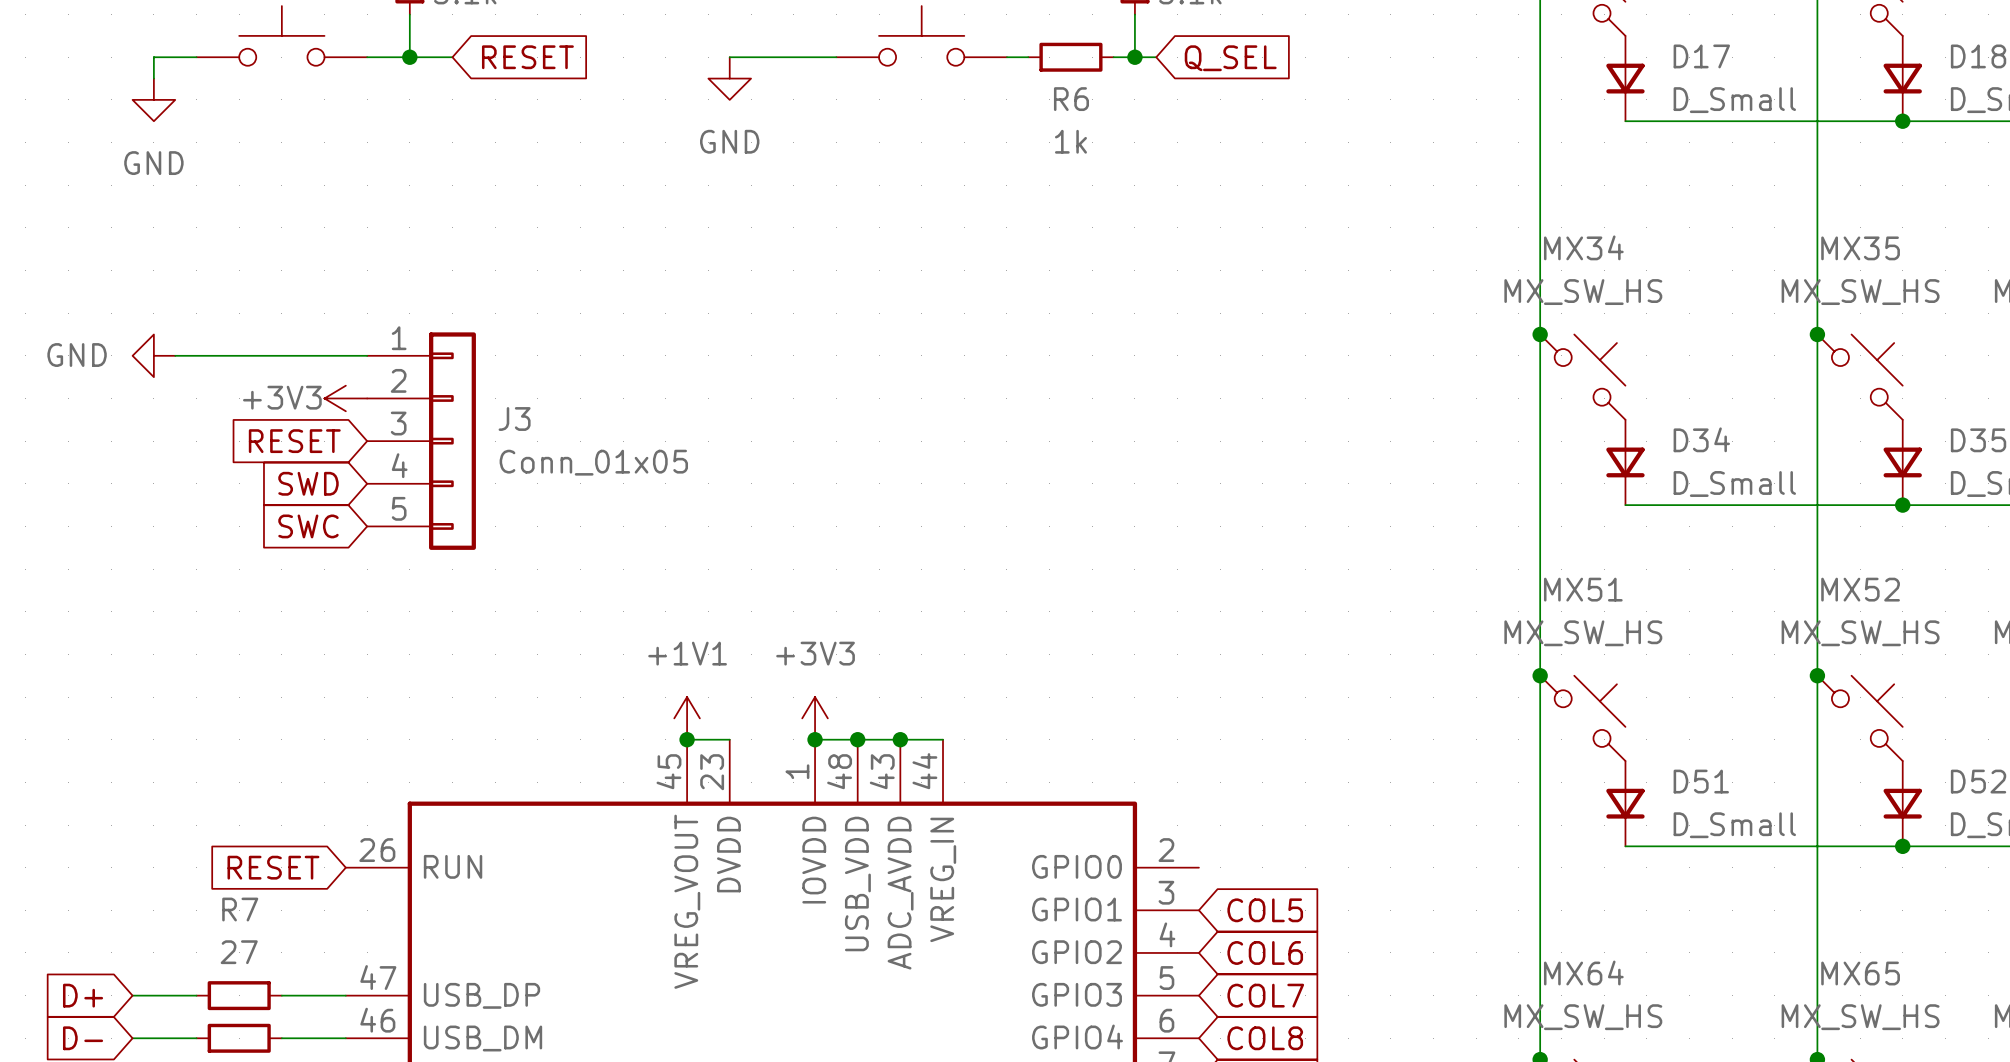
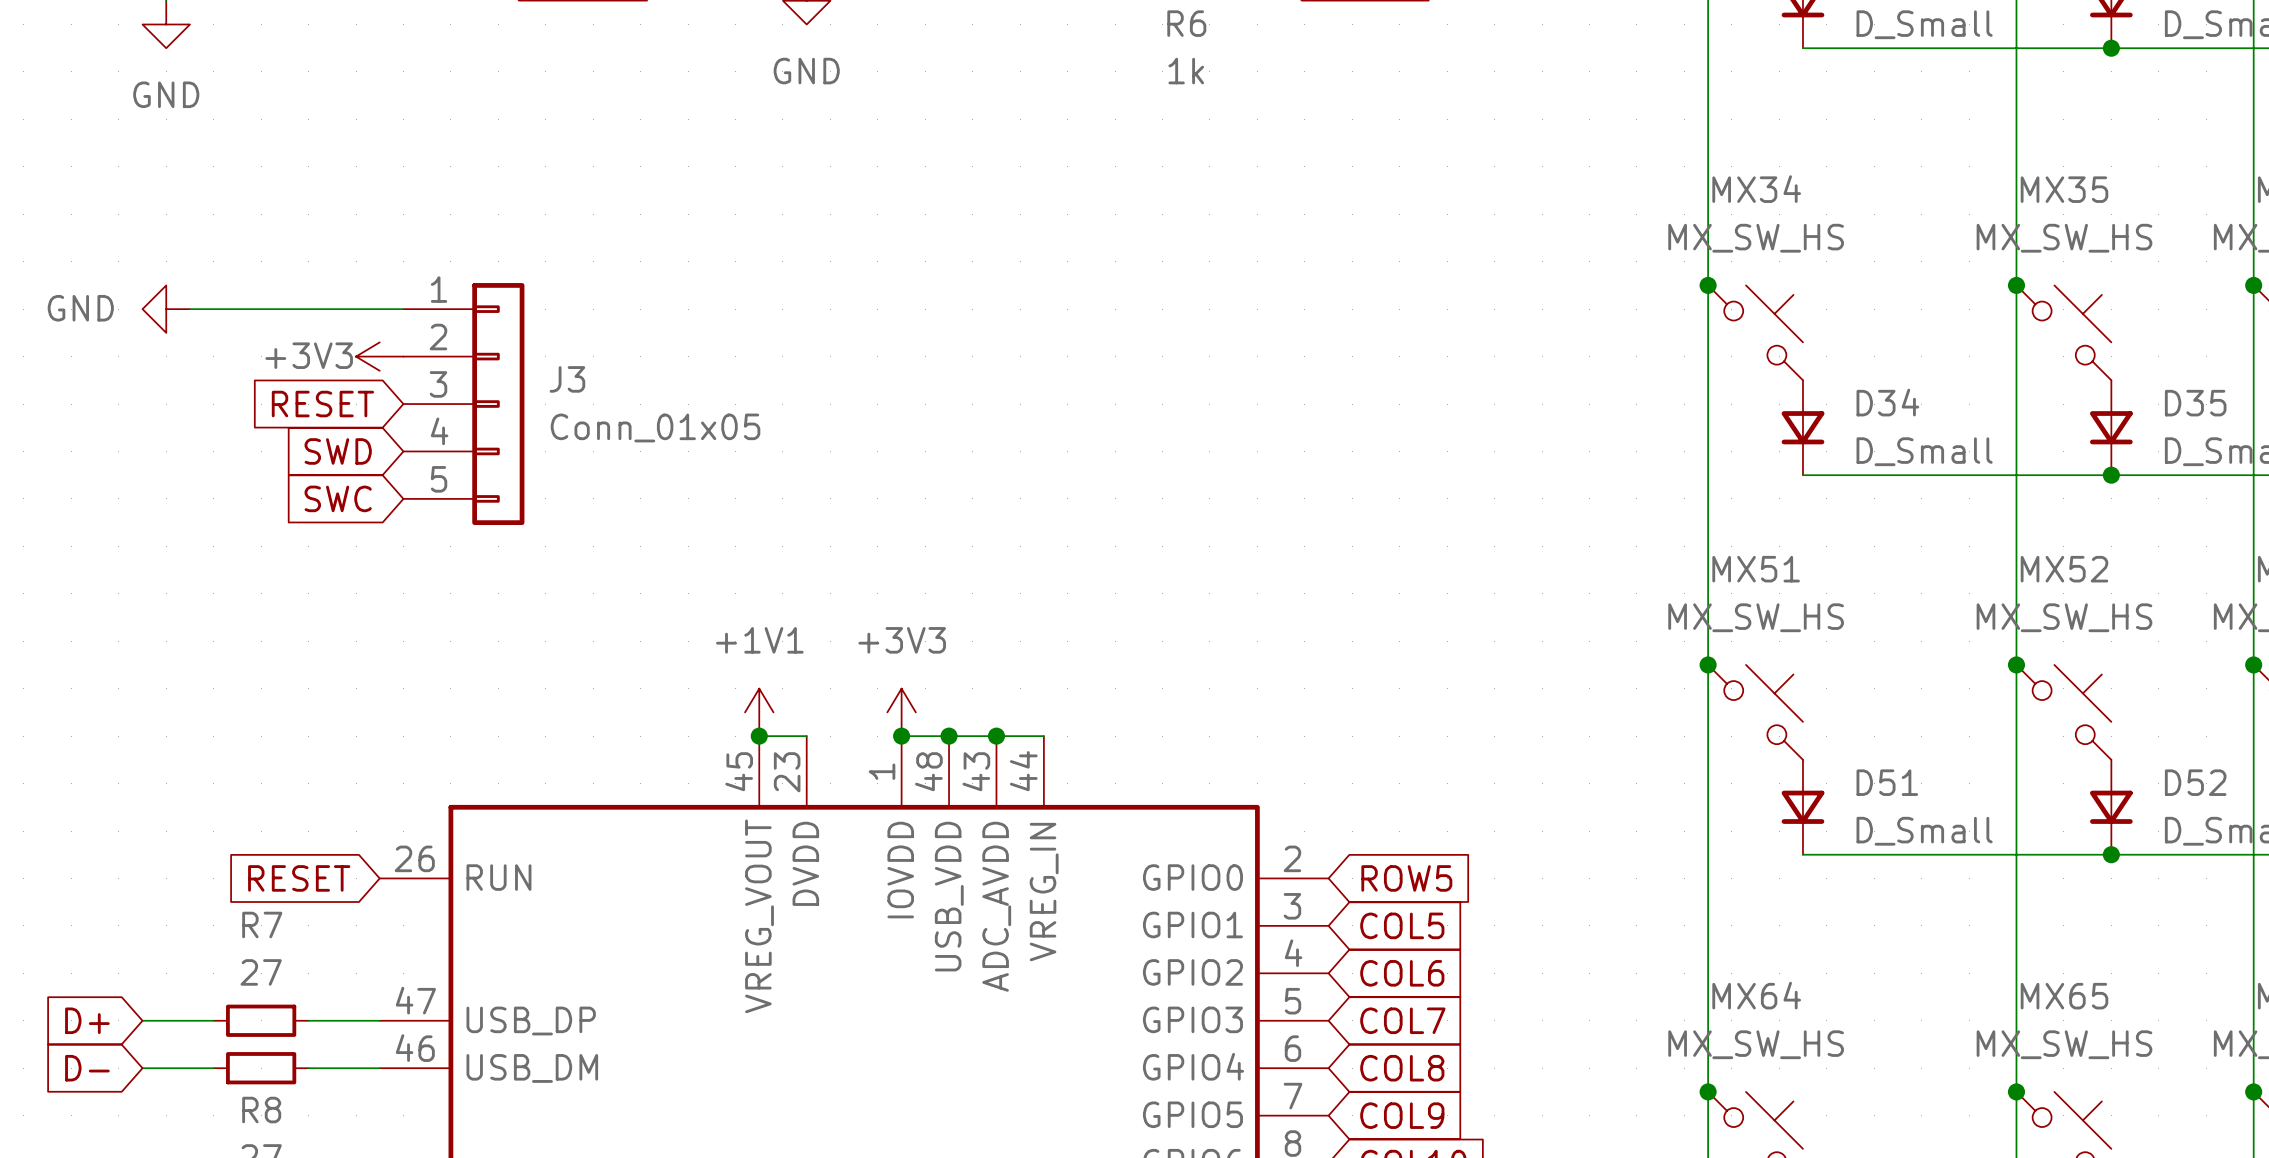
global label: none -> ROW5 (1406, 878)

